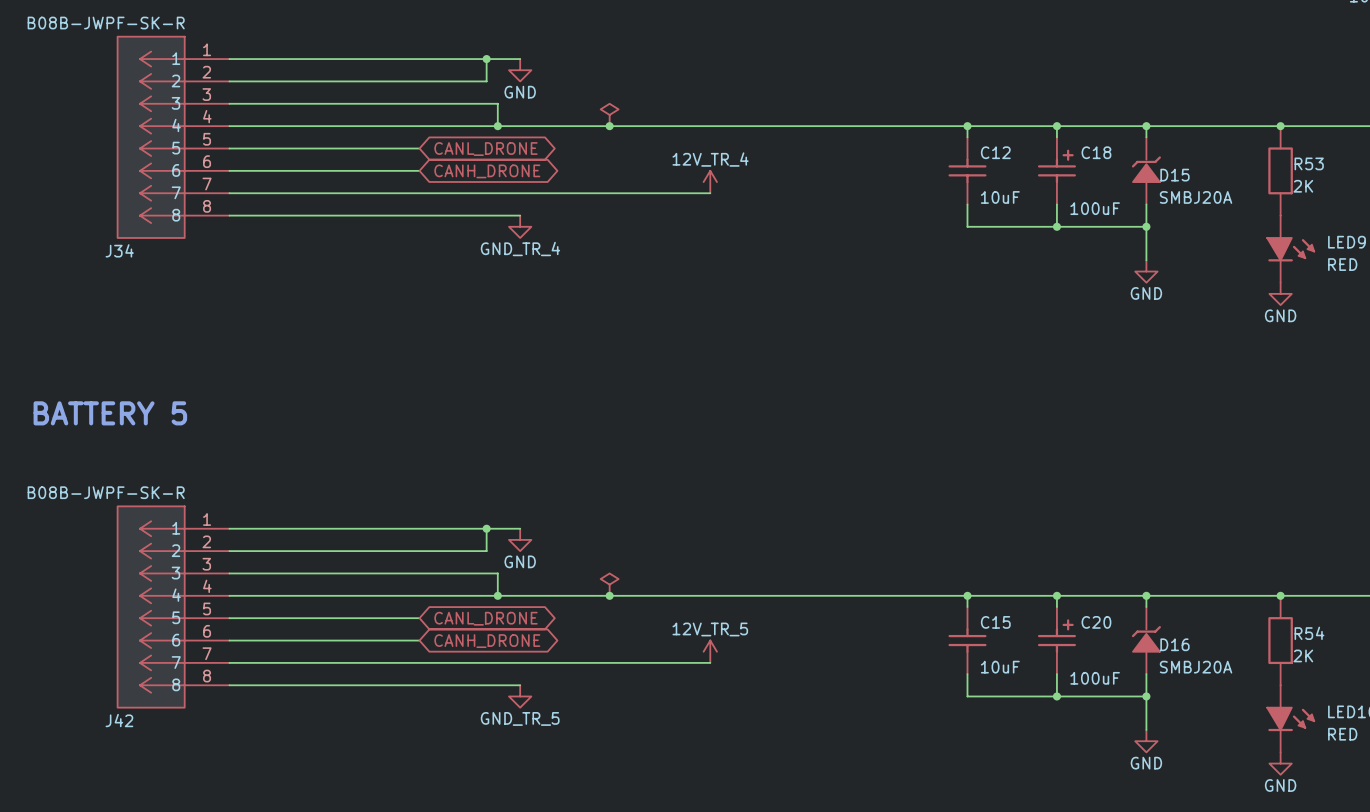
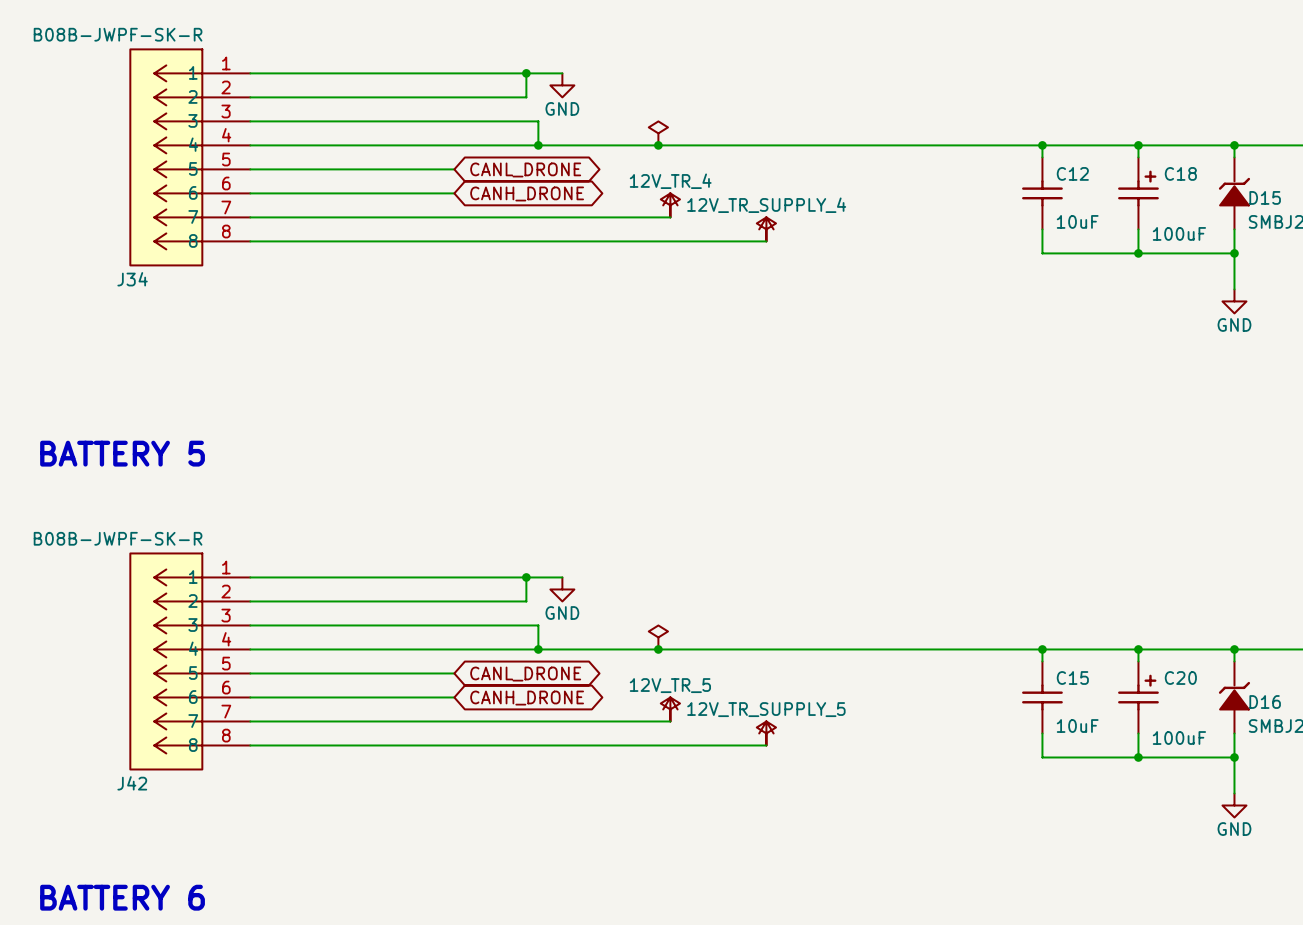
power symbol: none -> (670, 205)
power symbol position: 12V_TR_4 (710, 182) -> 12V_TR_4 (670, 205)
wire: (620, 193) (710, 193) -> none
power symbol: none -> (766, 229)
power symbol: none -> 12V_TR_SUPPLY_4 (766, 229)
wire: none -> (562, 241) (766, 241)
power symbol: GND_TR_4 (520, 226) -> none
power symbol: none -> (670, 709)
power symbol position: 12V_TR_5 (710, 651) -> 12V_TR_5 (670, 709)
wire: (620, 662) (710, 662) -> none
power symbol: none -> (766, 733)
power symbol: none -> 12V_TR_SUPPLY_5 (766, 733)
wire: none -> (562, 745) (766, 745)
power symbol: GND_TR_5 (520, 696) -> none

